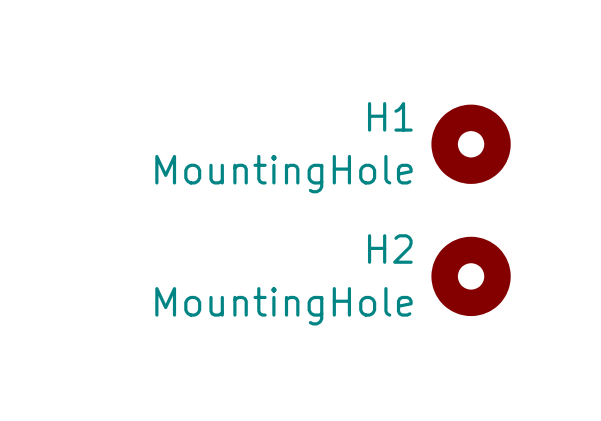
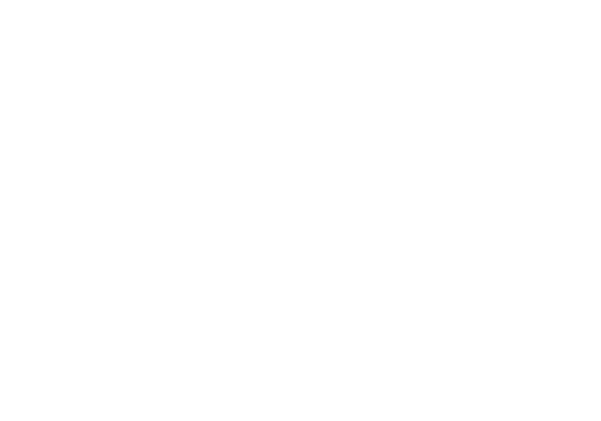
H1: MountingHole (471, 144) -> none
H2: MountingHole (471, 276) -> none

